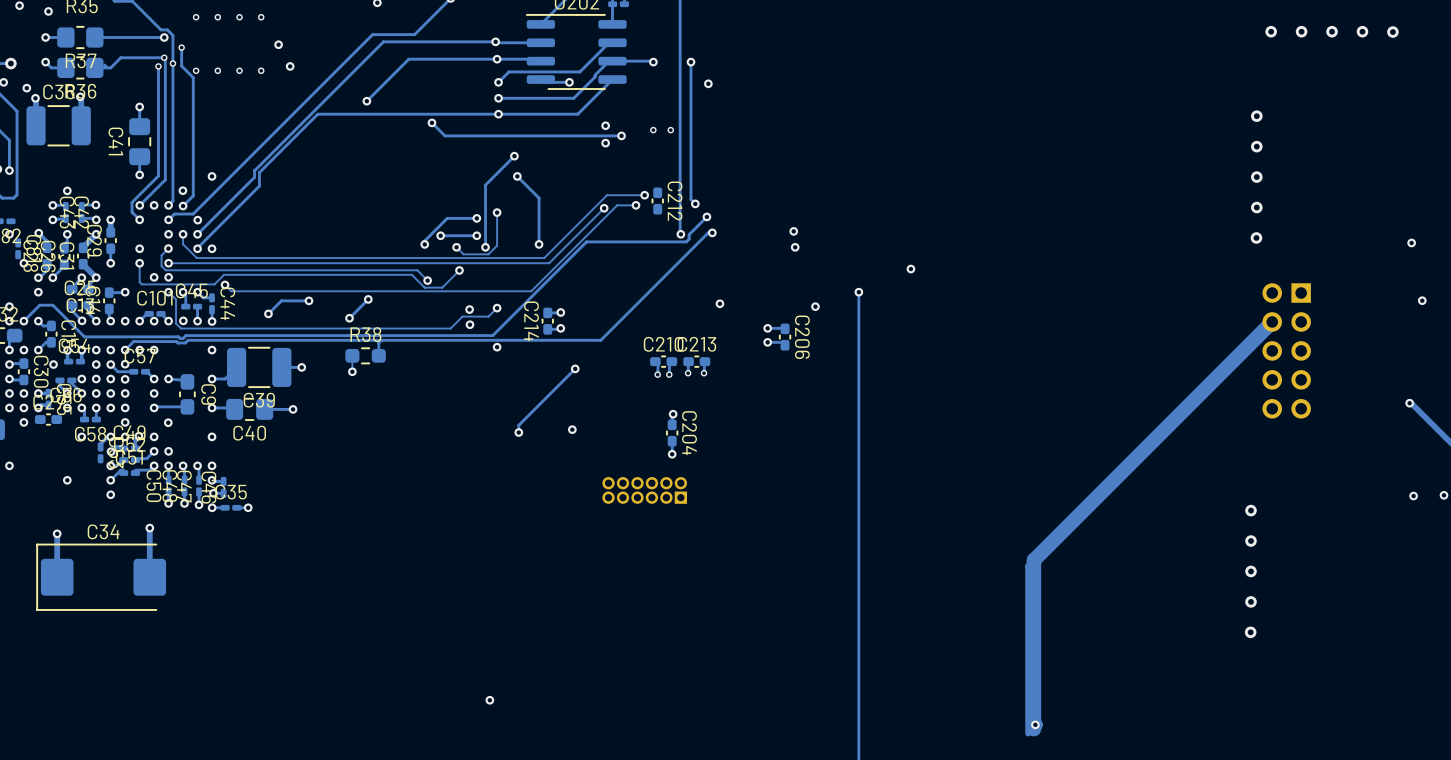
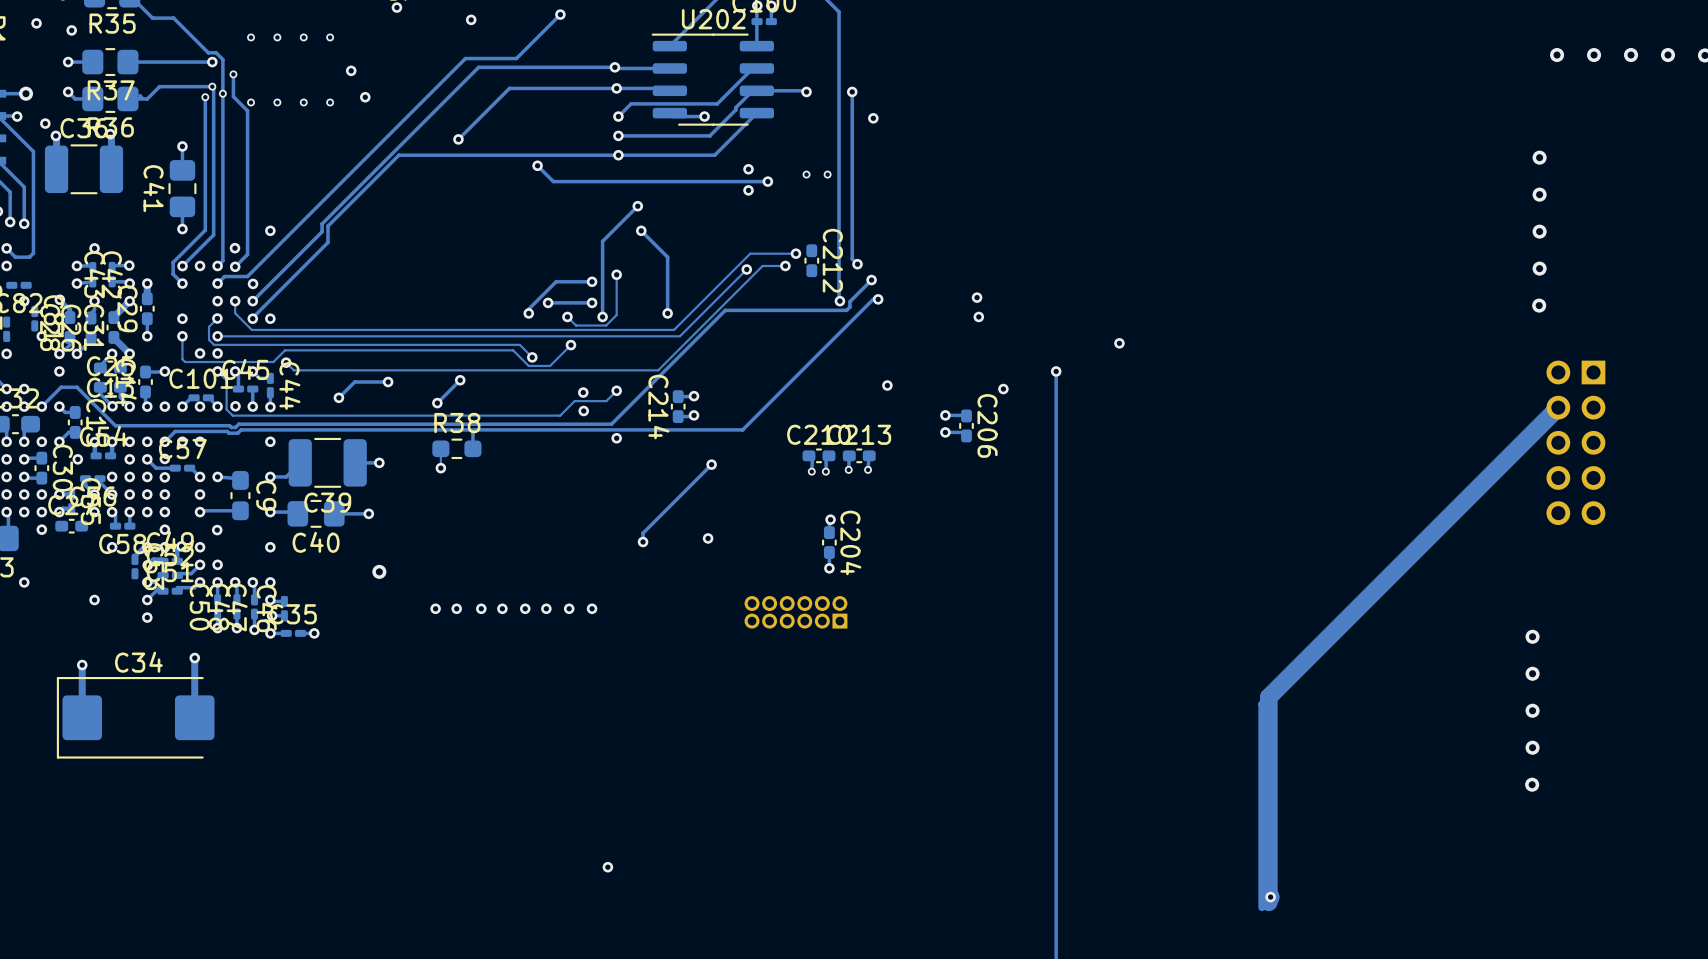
via: none -> (379, 571)
via: none -> (435, 608)
via: none -> (456, 608)
via: none -> (481, 608)
via: none -> (502, 608)
via: none -> (525, 608)
via: none -> (546, 608)
via: none -> (569, 608)
via: none -> (592, 608)

